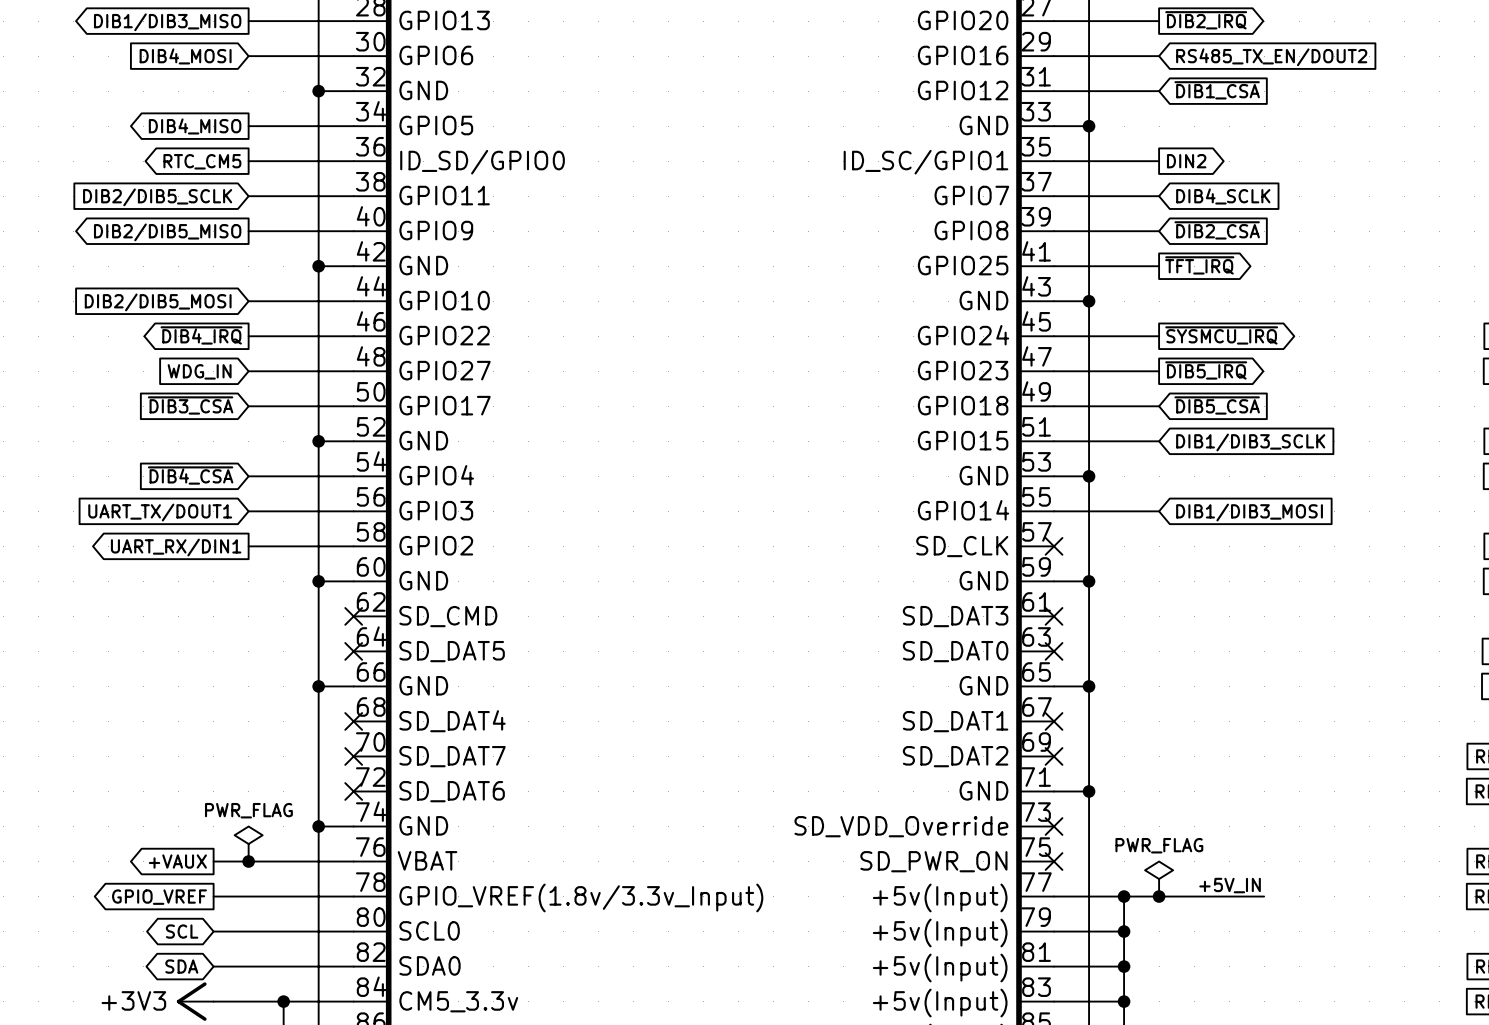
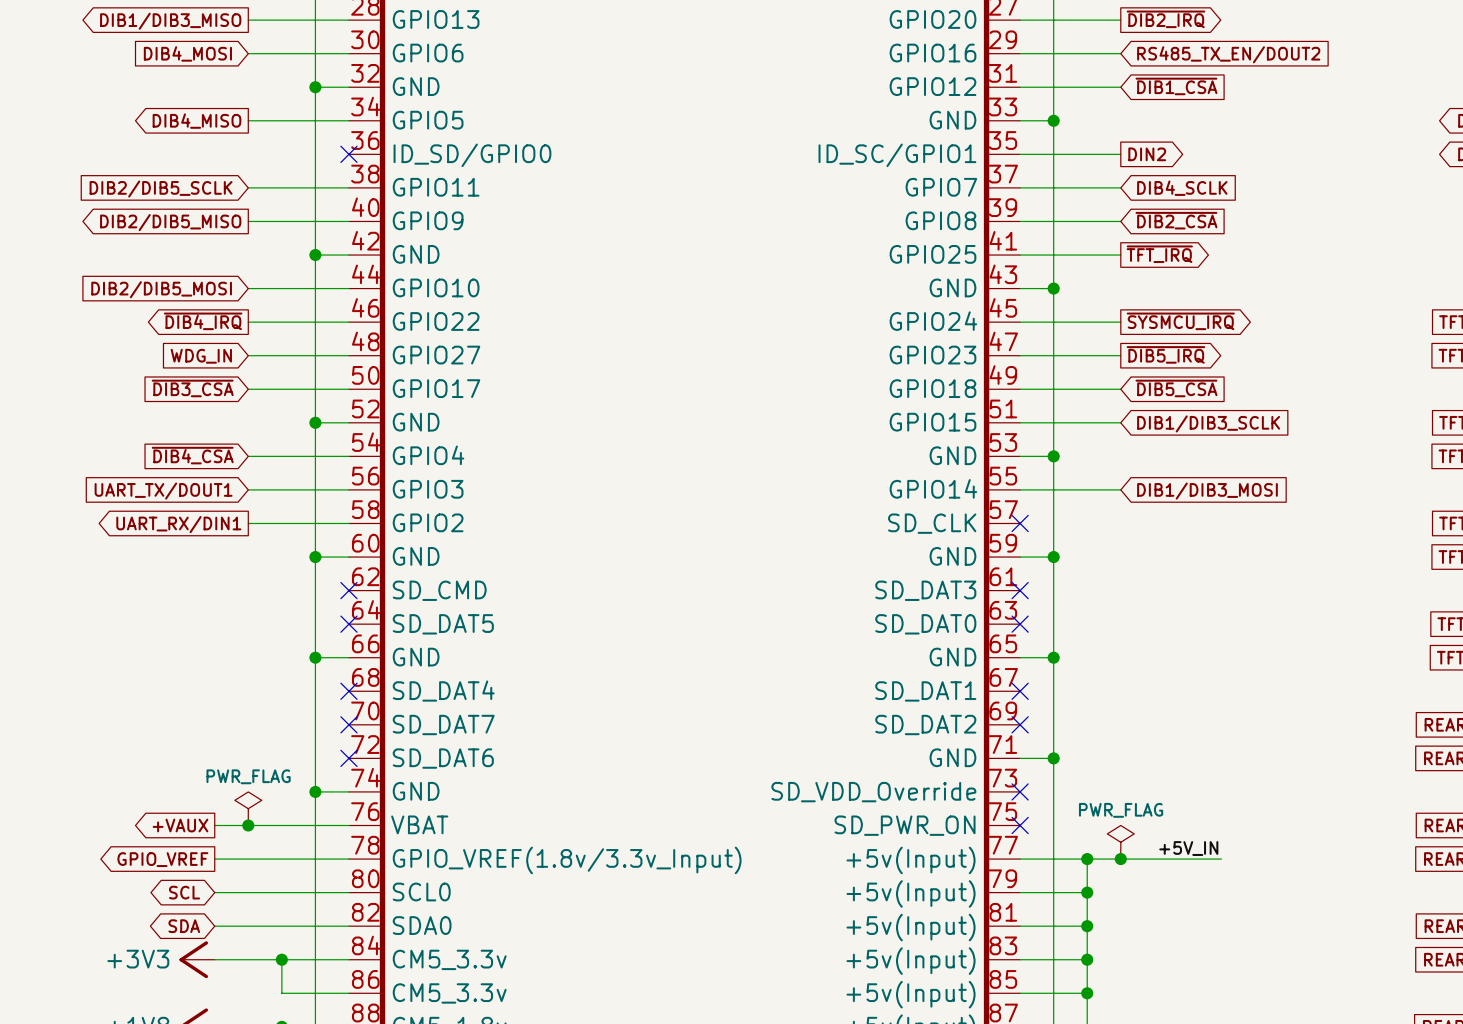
global label: RTC_CM5 (202, 161) -> none
wire: (248, 161) (353, 161) -> none
no-connect mark: none -> (348, 154)

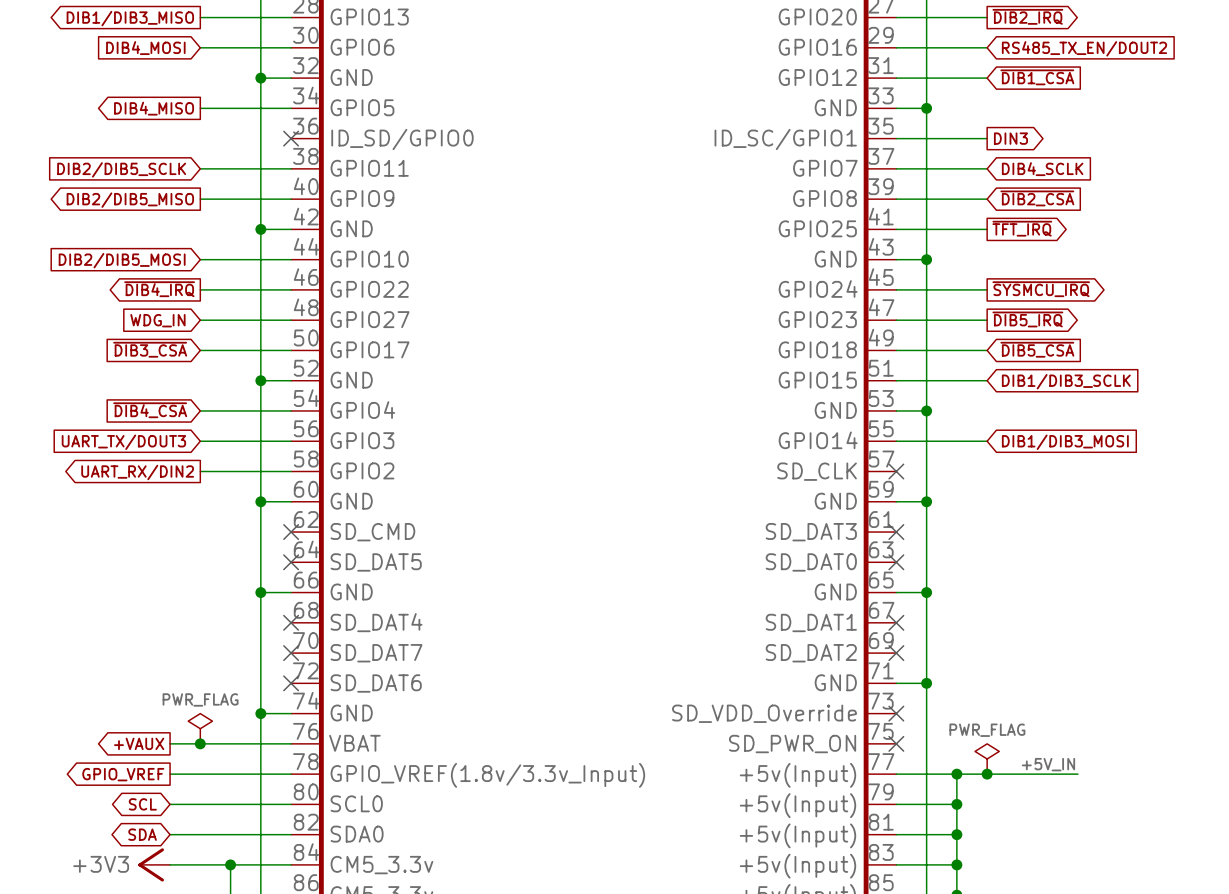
global label: DIN2 (1147, 154) -> DIN3 (1010, 138)
global label: UART_TX/DOUT1 (163, 491) -> UART_TX/DOUT3 (123, 442)
global label: UART_RX/DIN1 (178, 524) -> UART_RX/DIN2 (137, 472)

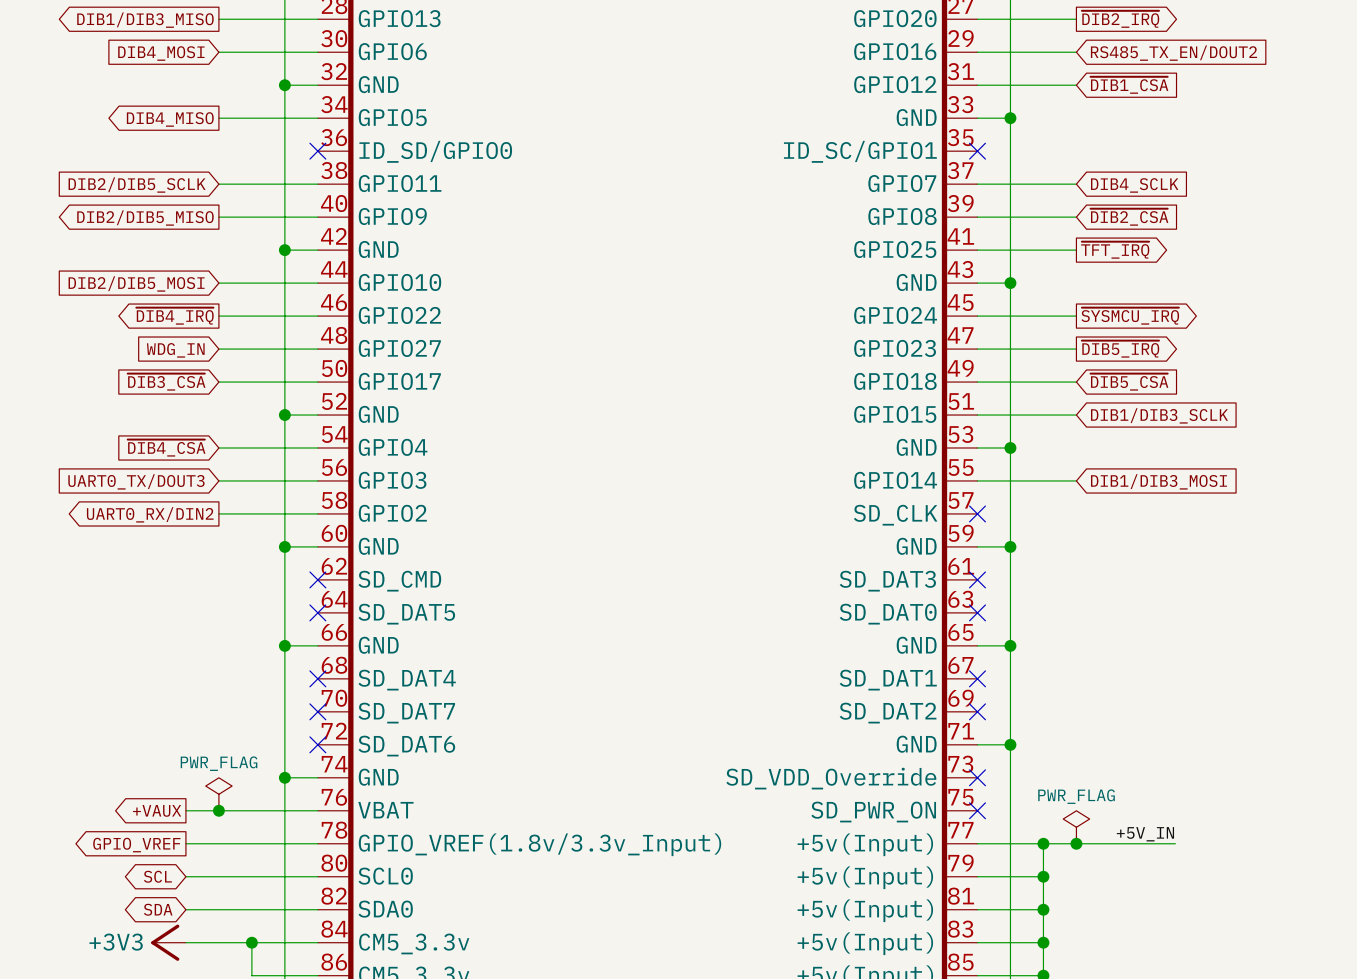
wire: (896, 138) (987, 138) -> none
no-connect mark: none -> (977, 151)
global label: DIN3 (1010, 138) -> none
global label: UART_TX/DOUT3 (123, 442) -> UART0_TX/DOUT3 (136, 481)
global label: UART_RX/DIN2 (137, 472) -> UART0_RX/DIN2 (150, 514)

